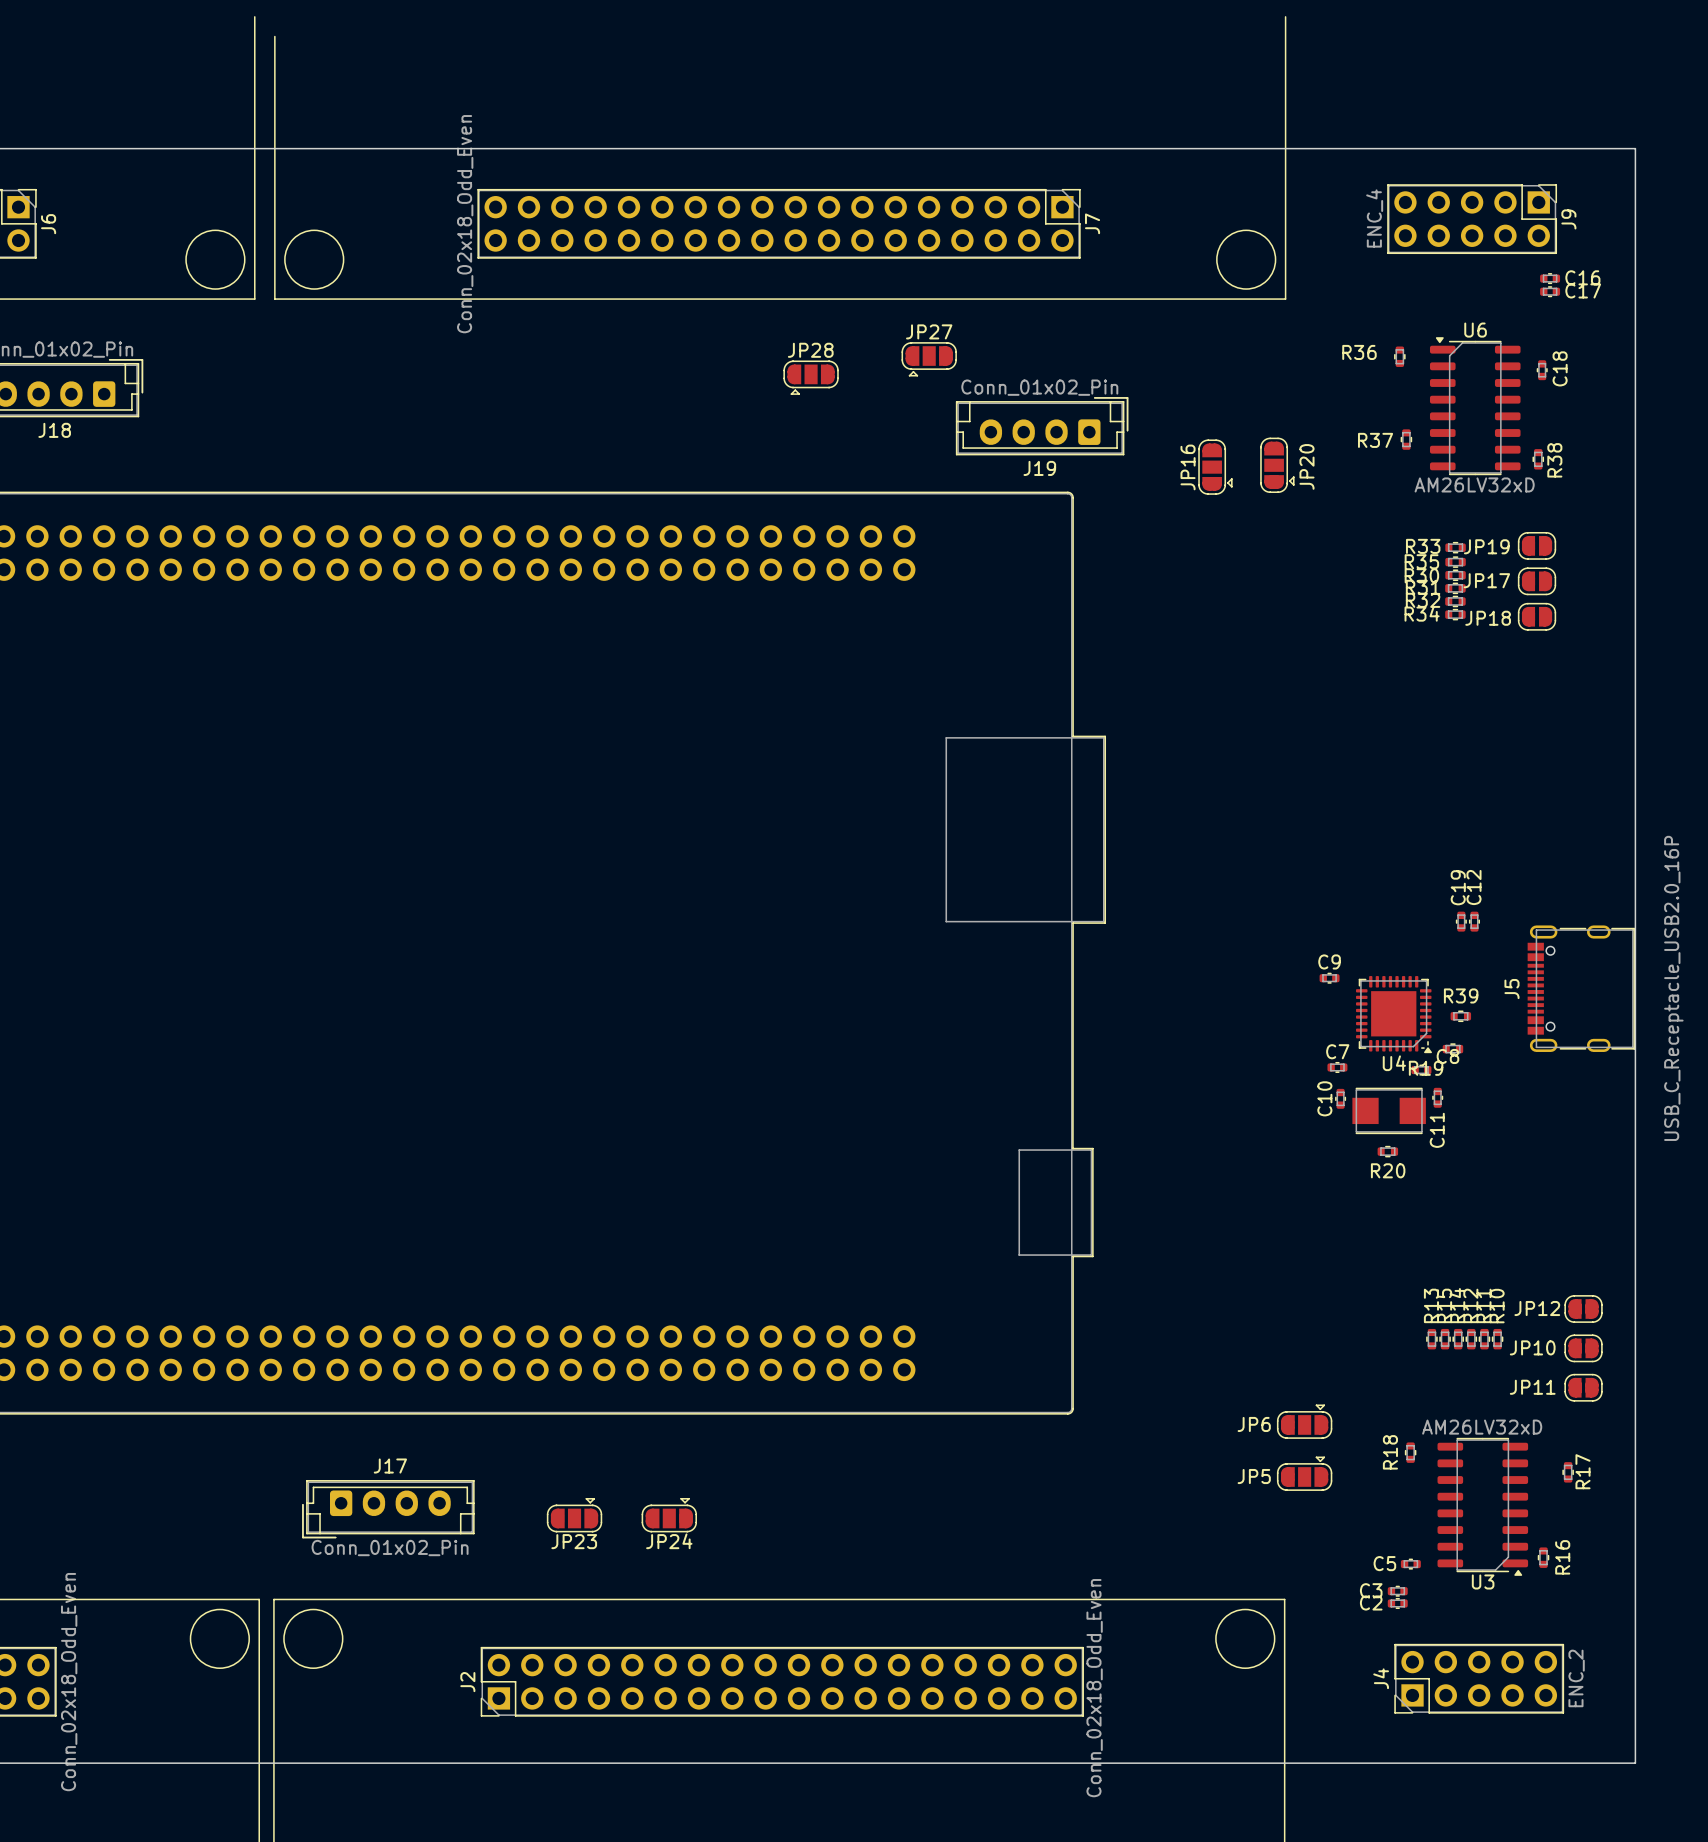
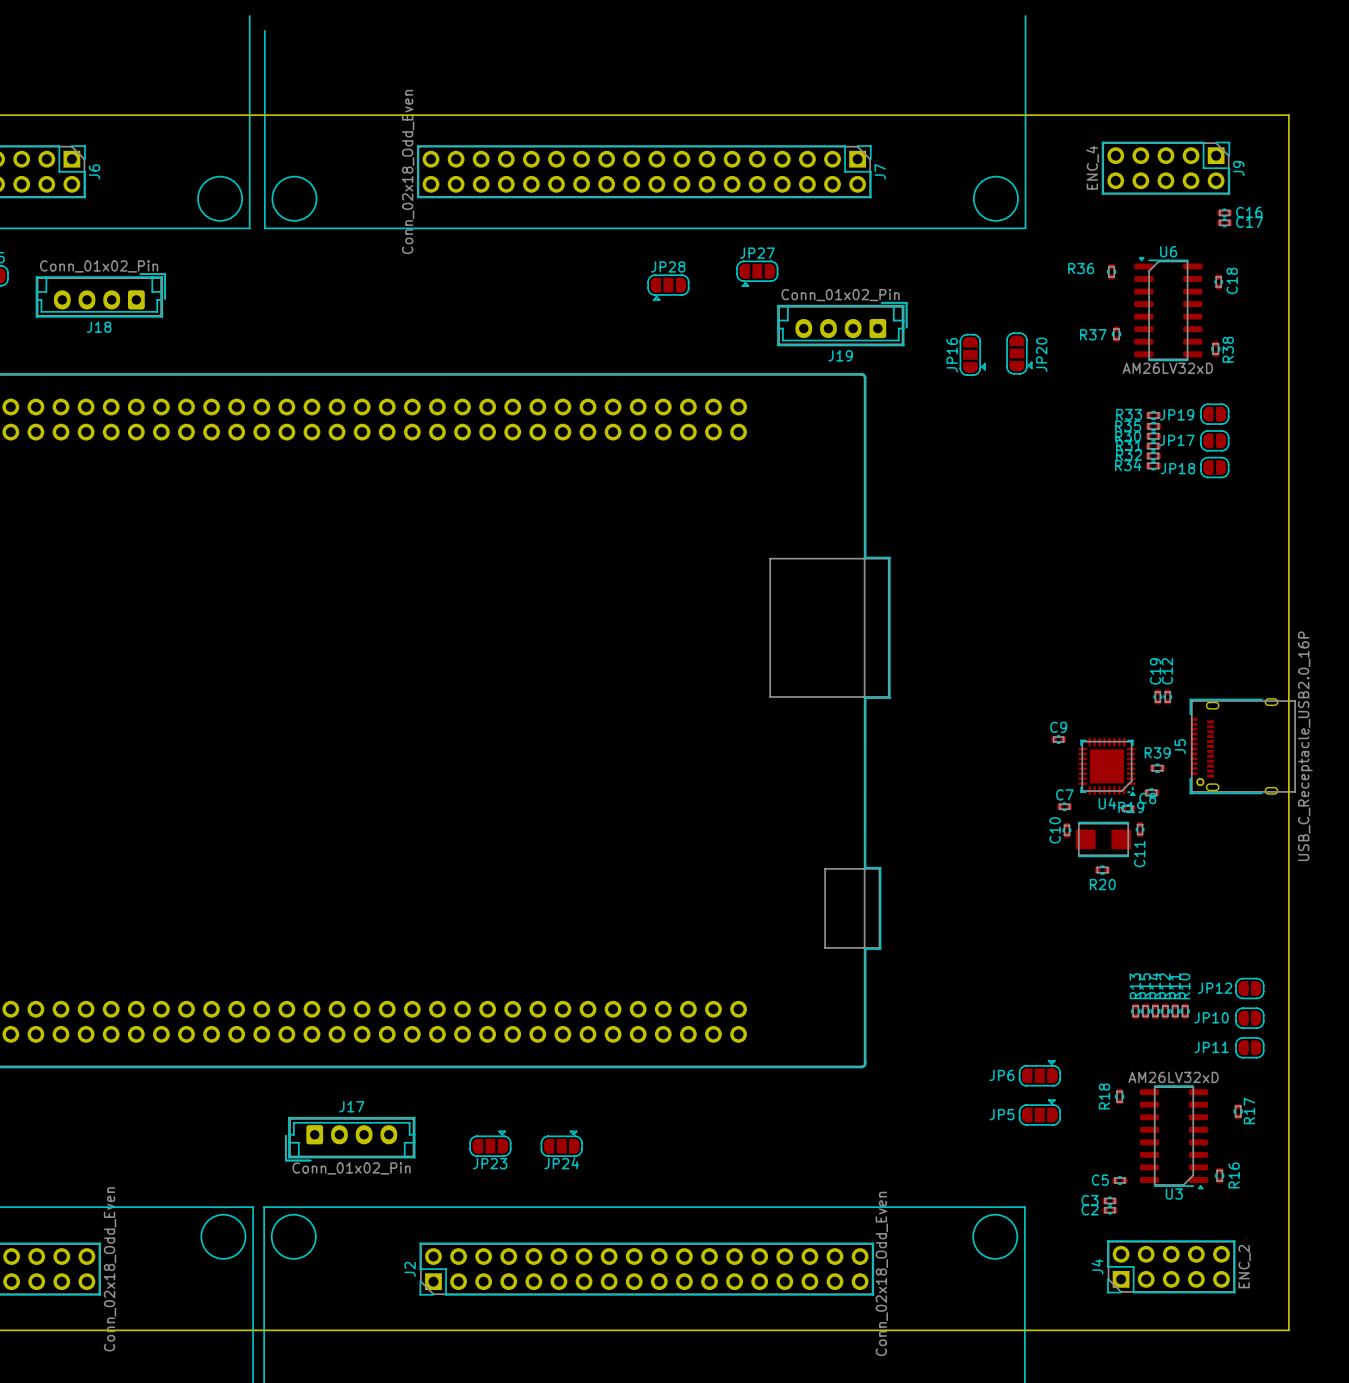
J5 footprint: [1527, 925, 1636, 1052] -> [1189, 698, 1296, 795]

